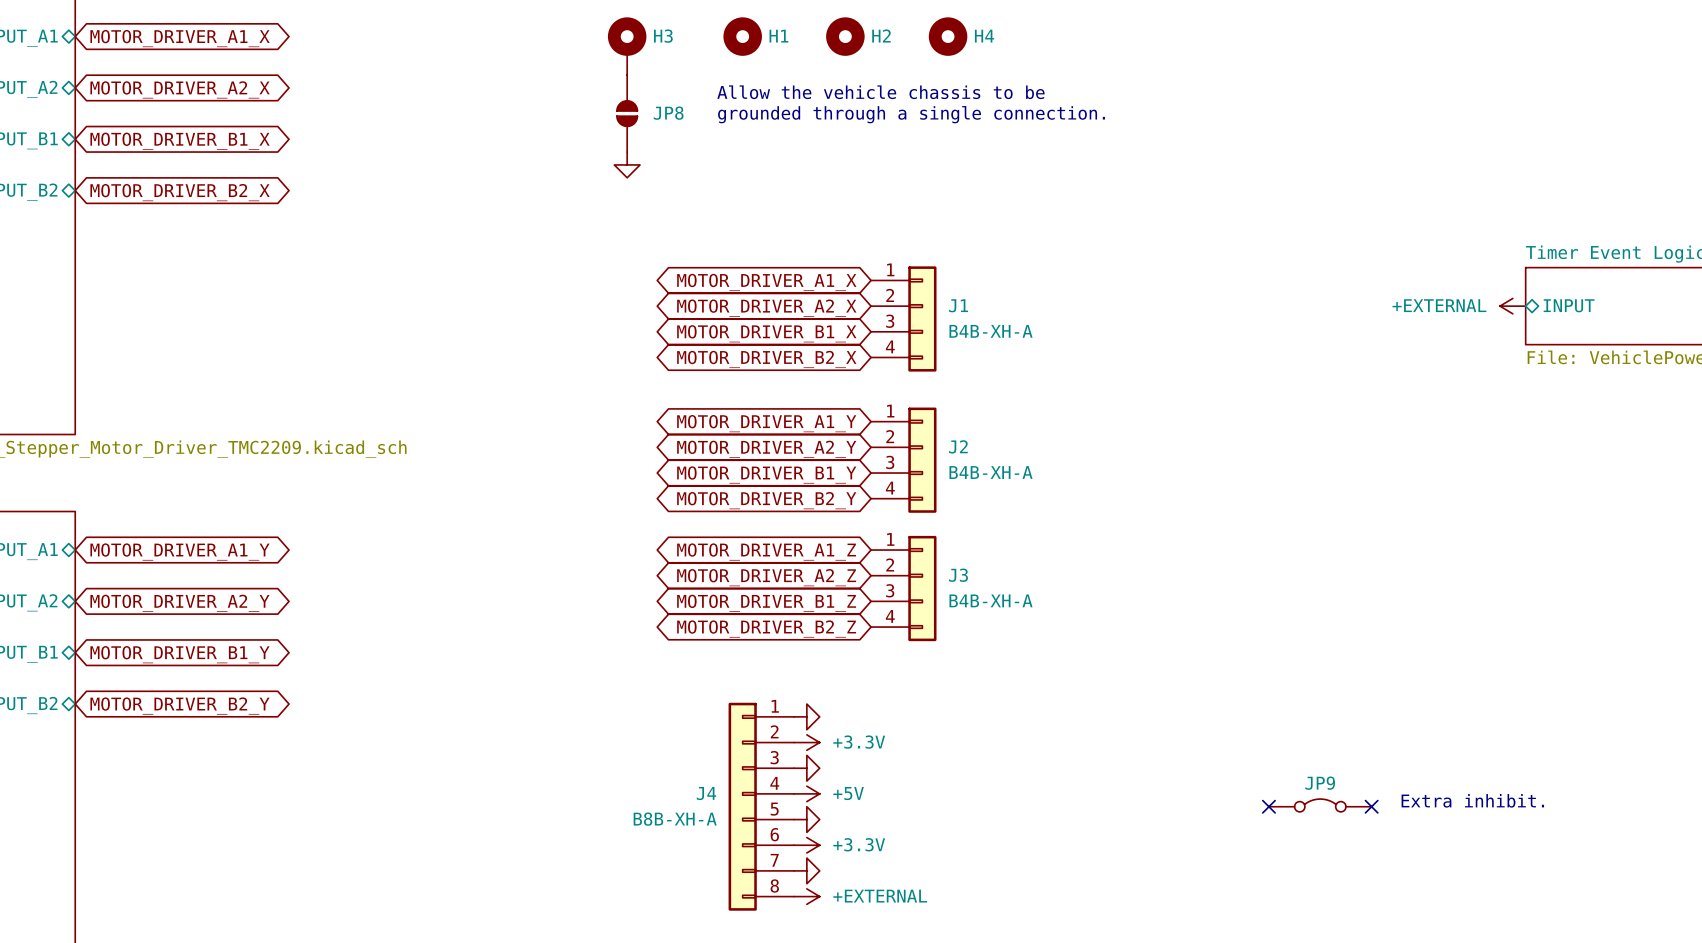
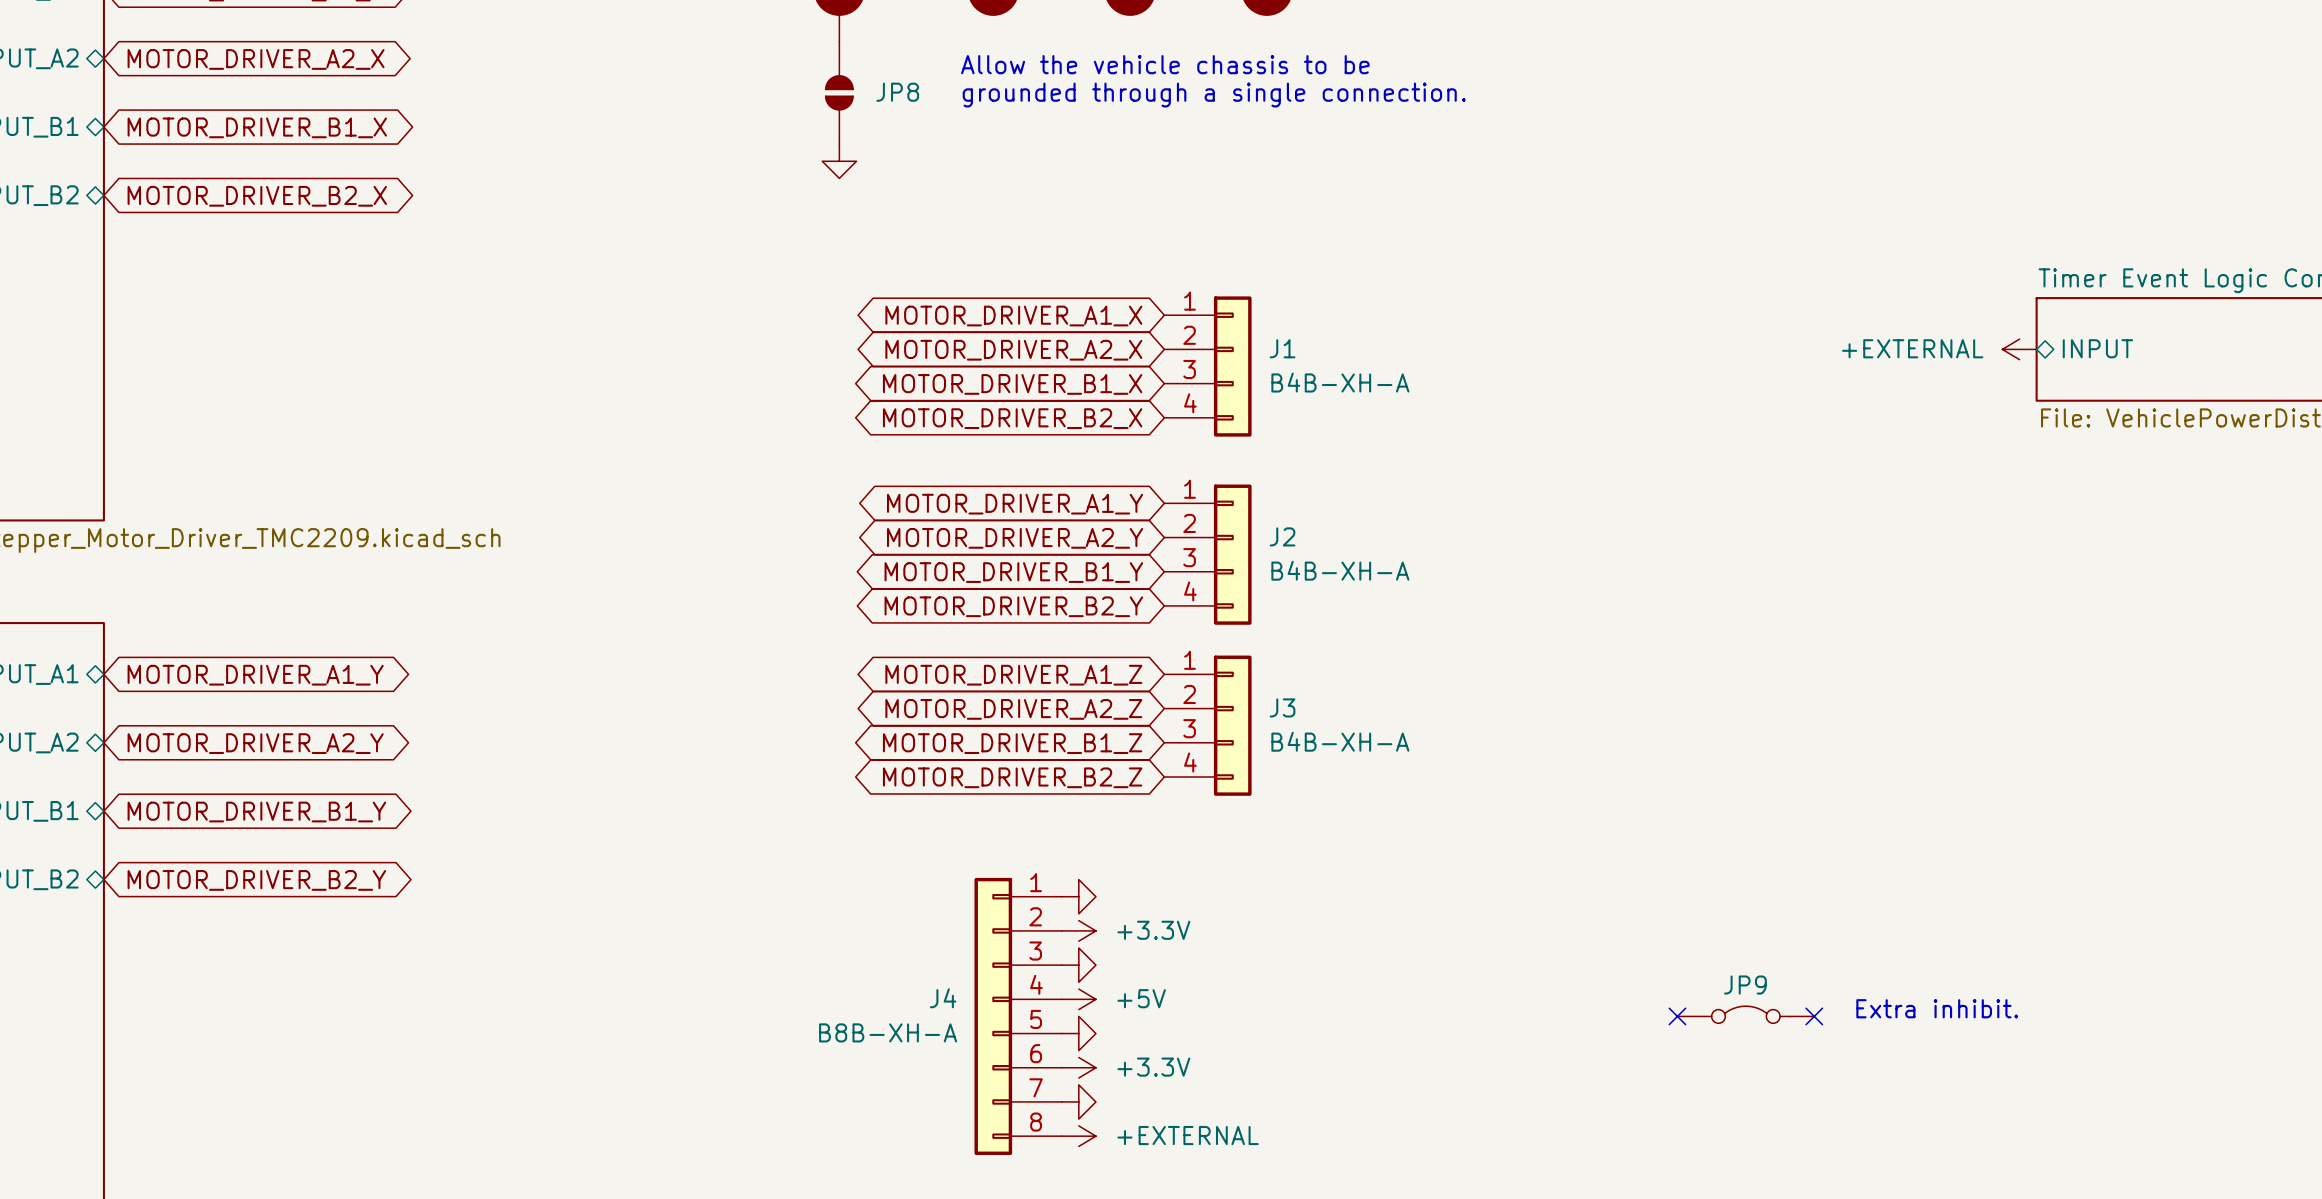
text position: Extra inhibit. (1472, 800) -> Extra inhibit. (1937, 1008)
JP9 position: (1320, 805) -> (1745, 1014)
no-connect mark position: (1268, 806) -> (1677, 1016)
no-connect mark position: (1371, 806) -> (1814, 1016)

